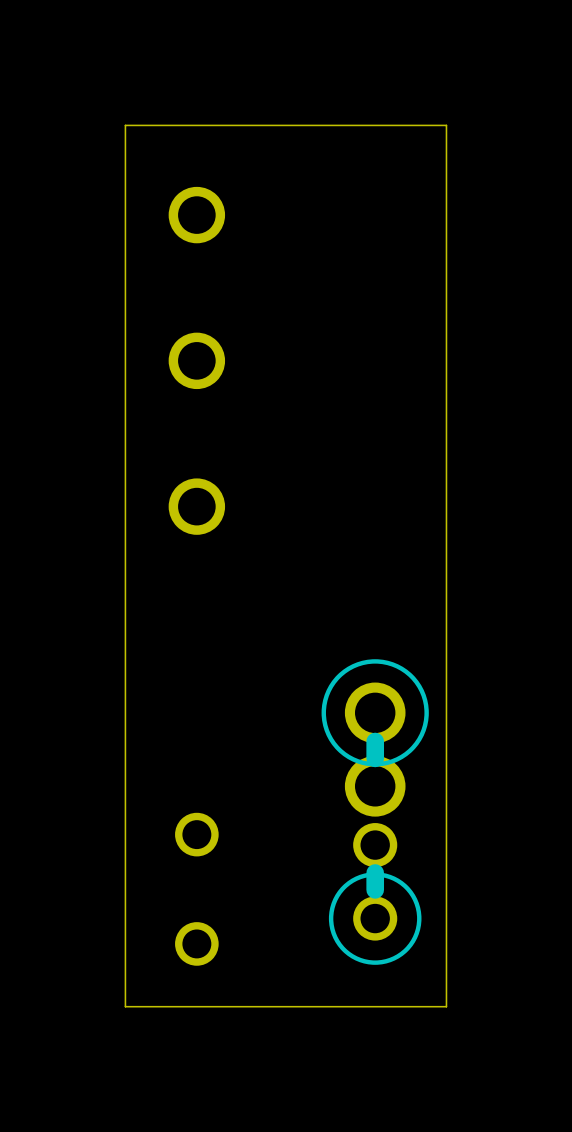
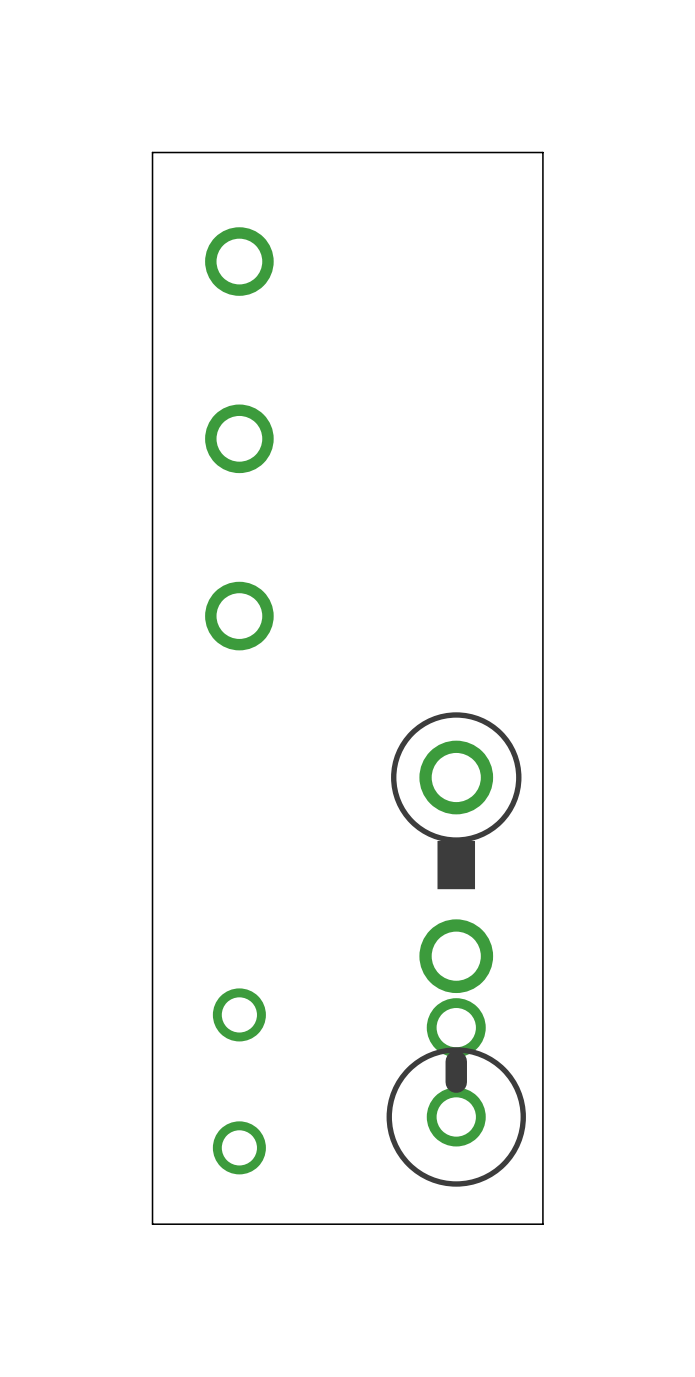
part: none -> (456, 852)
part: (375, 737) -> none
part footprint: [328, 823, 422, 965] -> [386, 998, 526, 1187]

